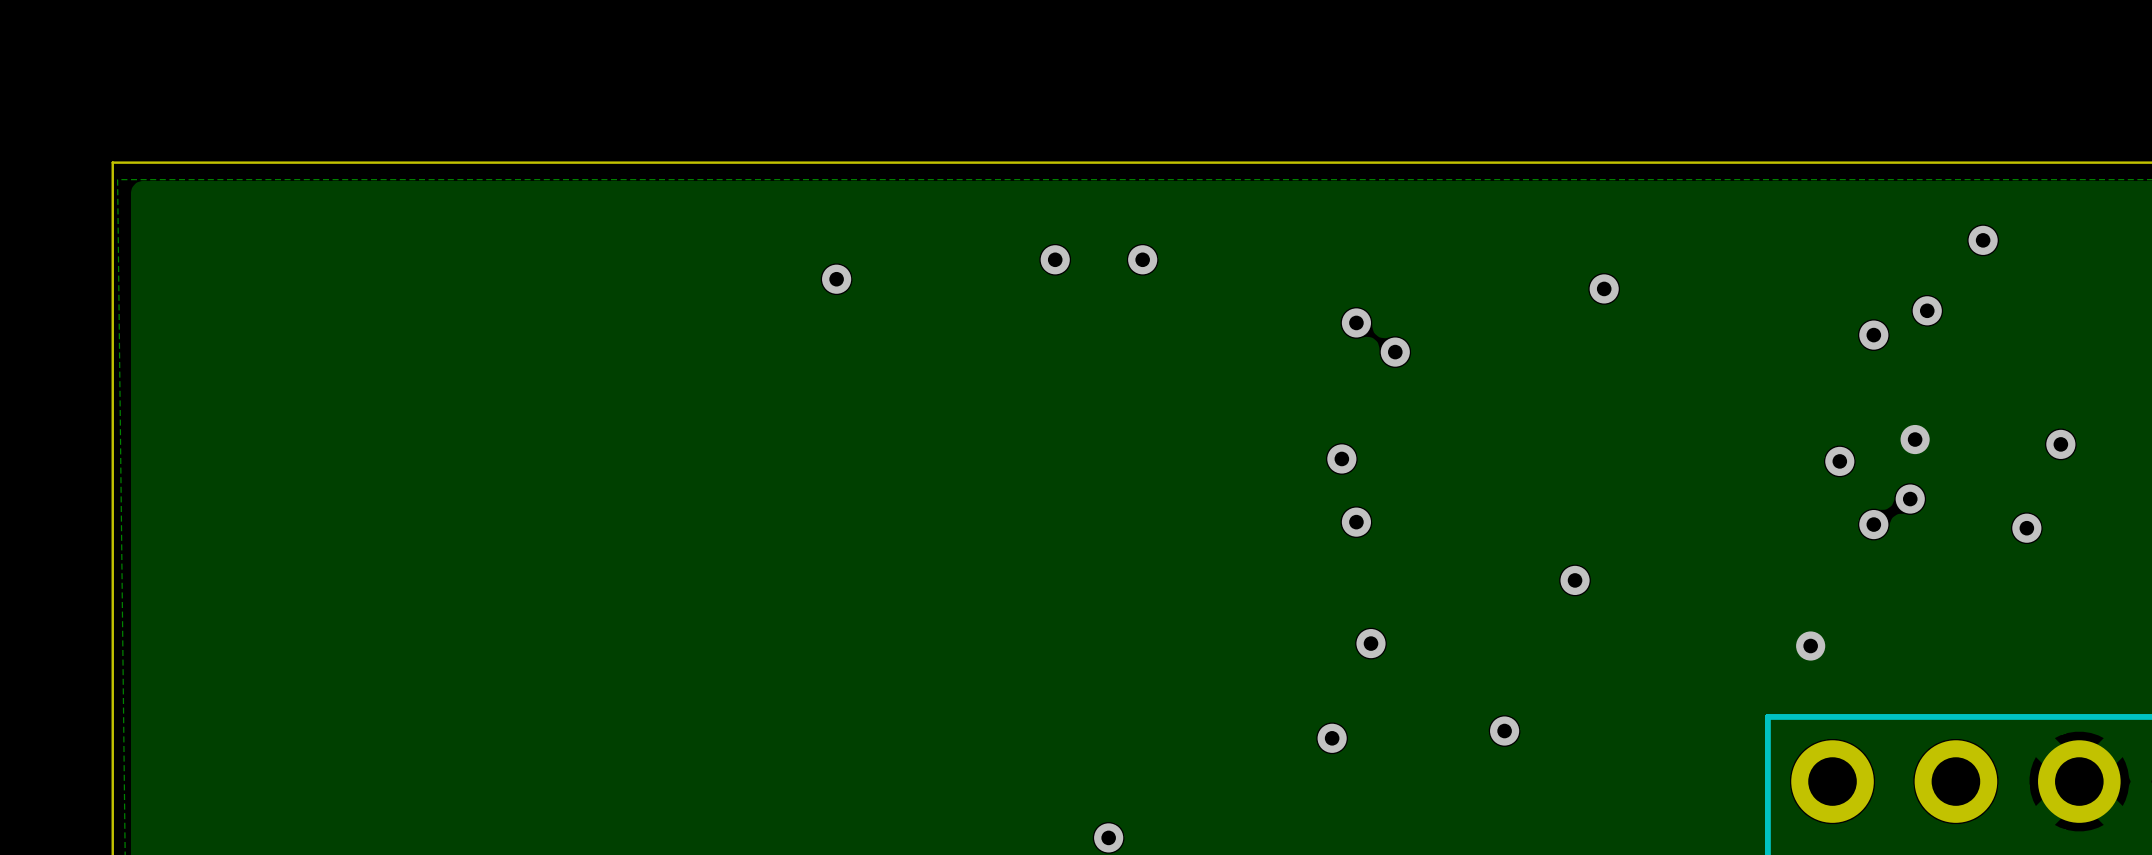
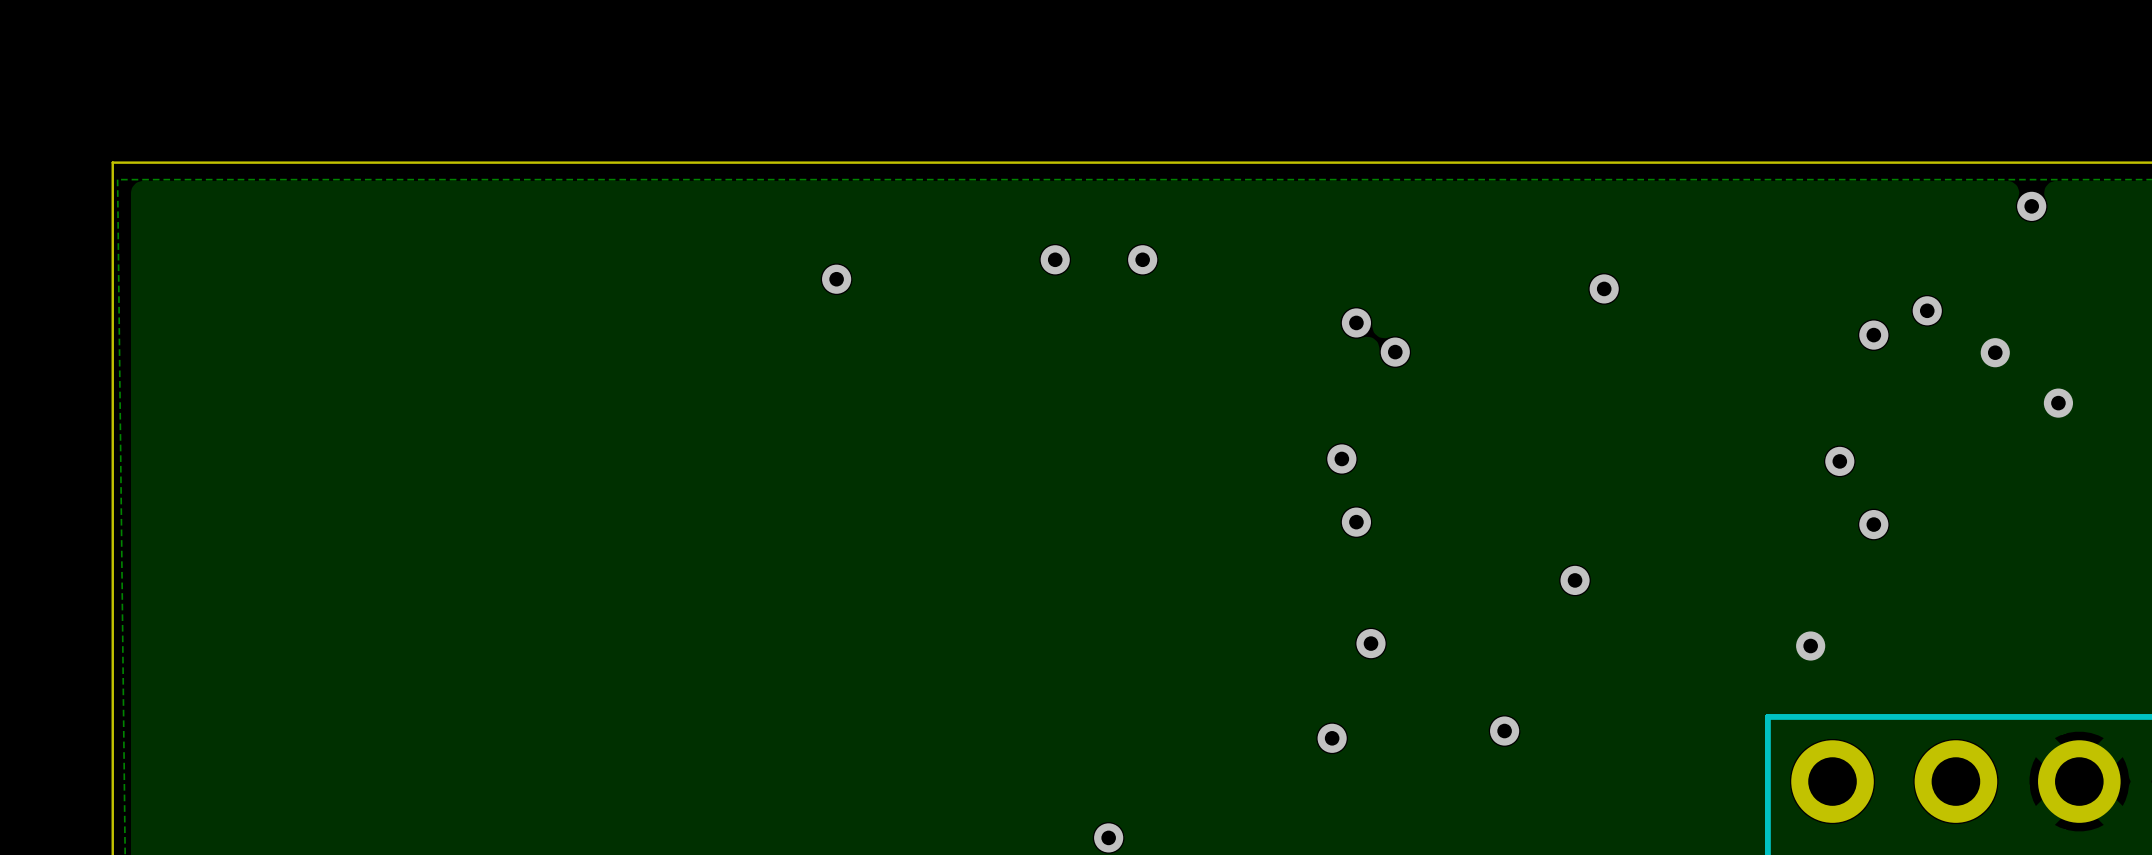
via: none -> (2031, 206)
via: (1983, 240) -> none
via: none -> (1995, 352)
via: (1915, 439) -> none
via position: (2060, 444) -> (2058, 403)
via: (1910, 499) -> none
via: (2026, 528) -> none

